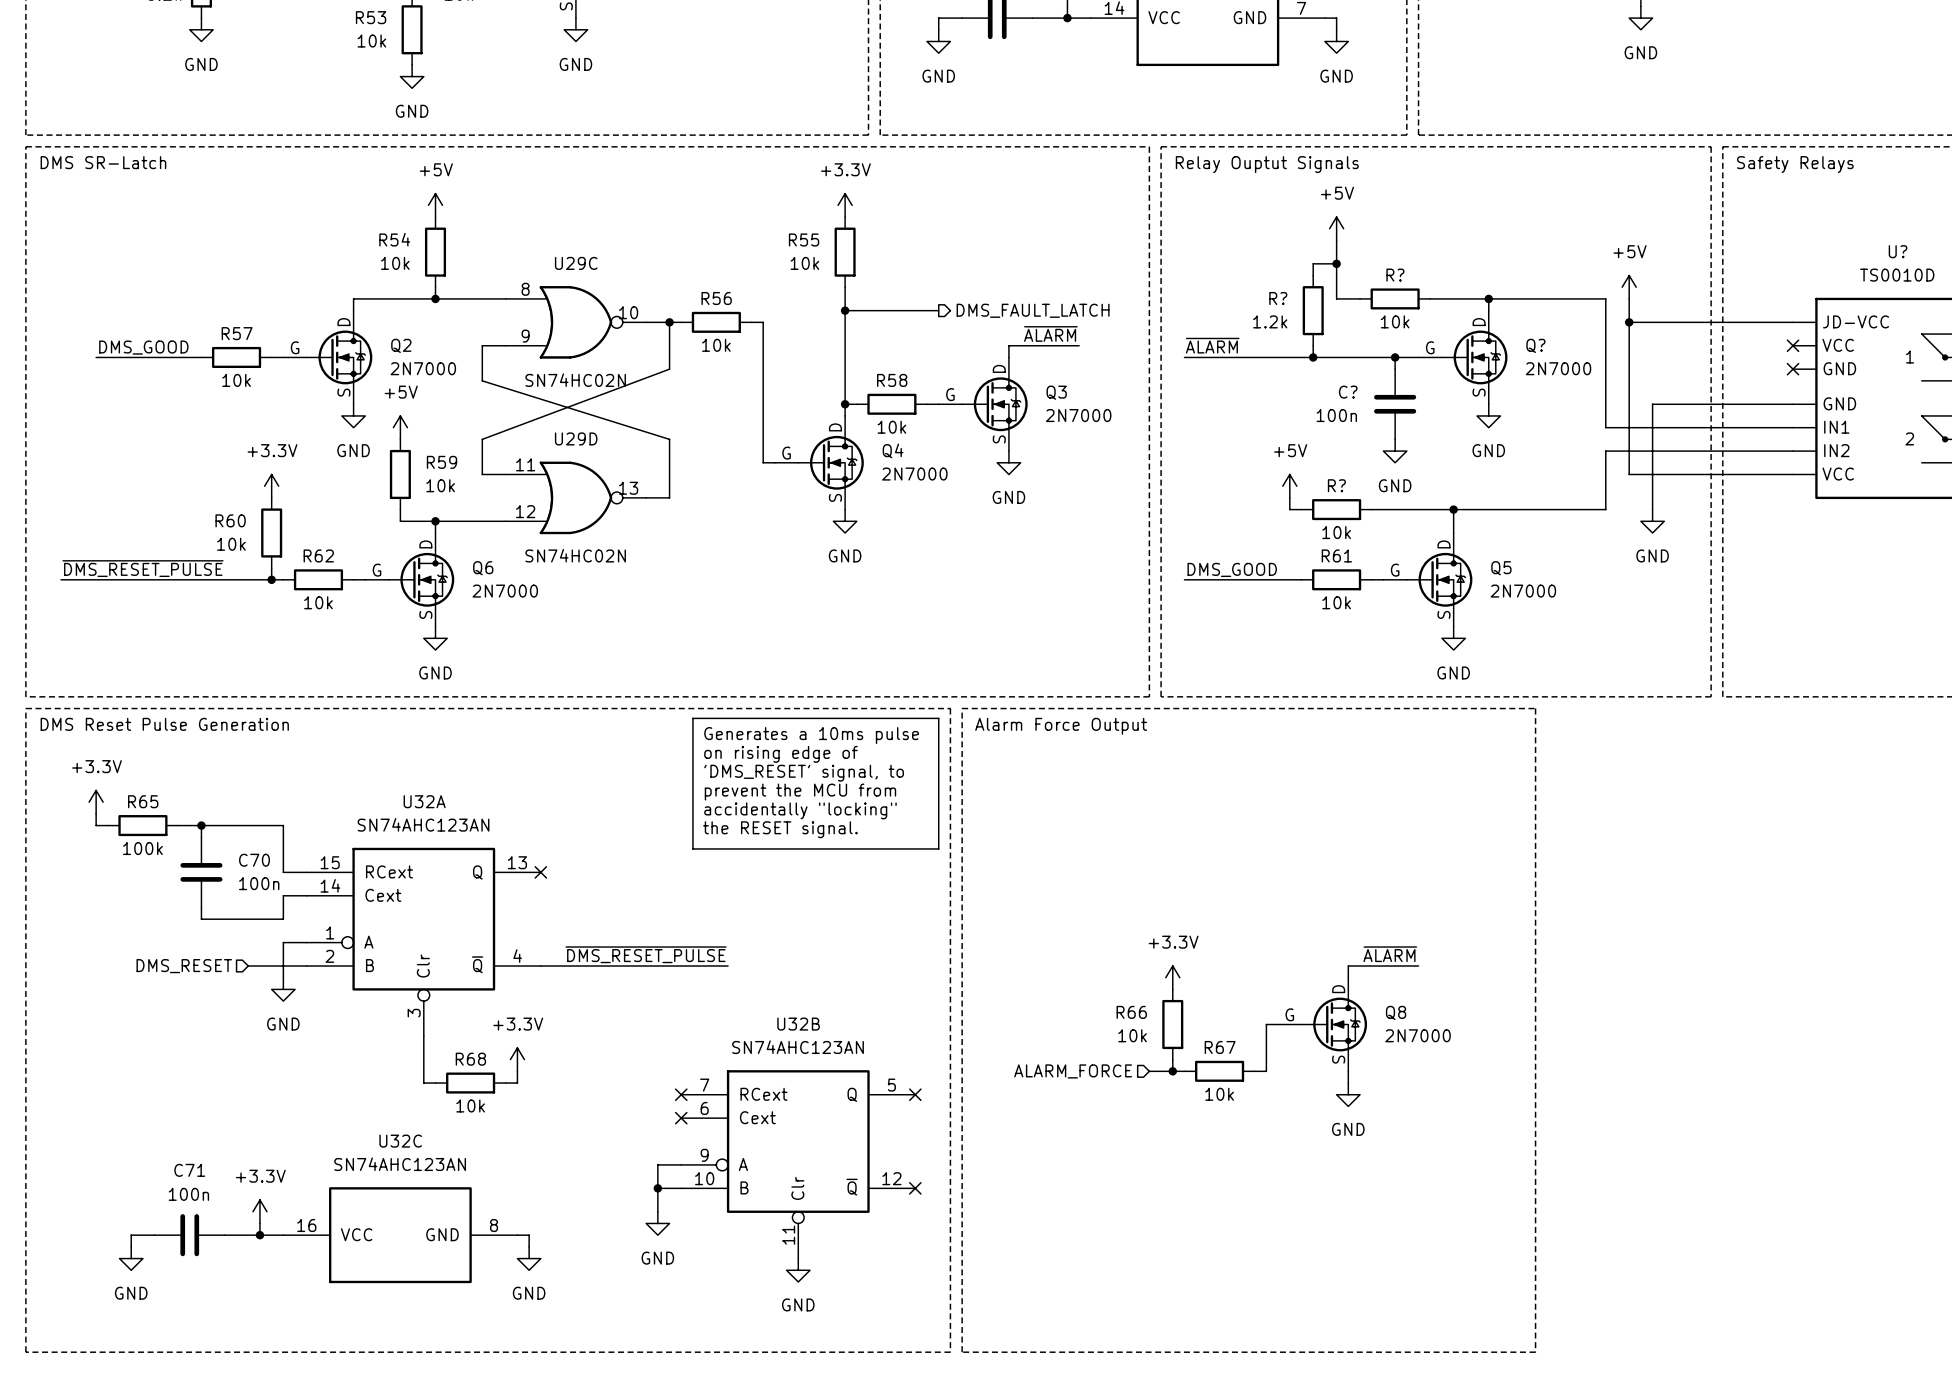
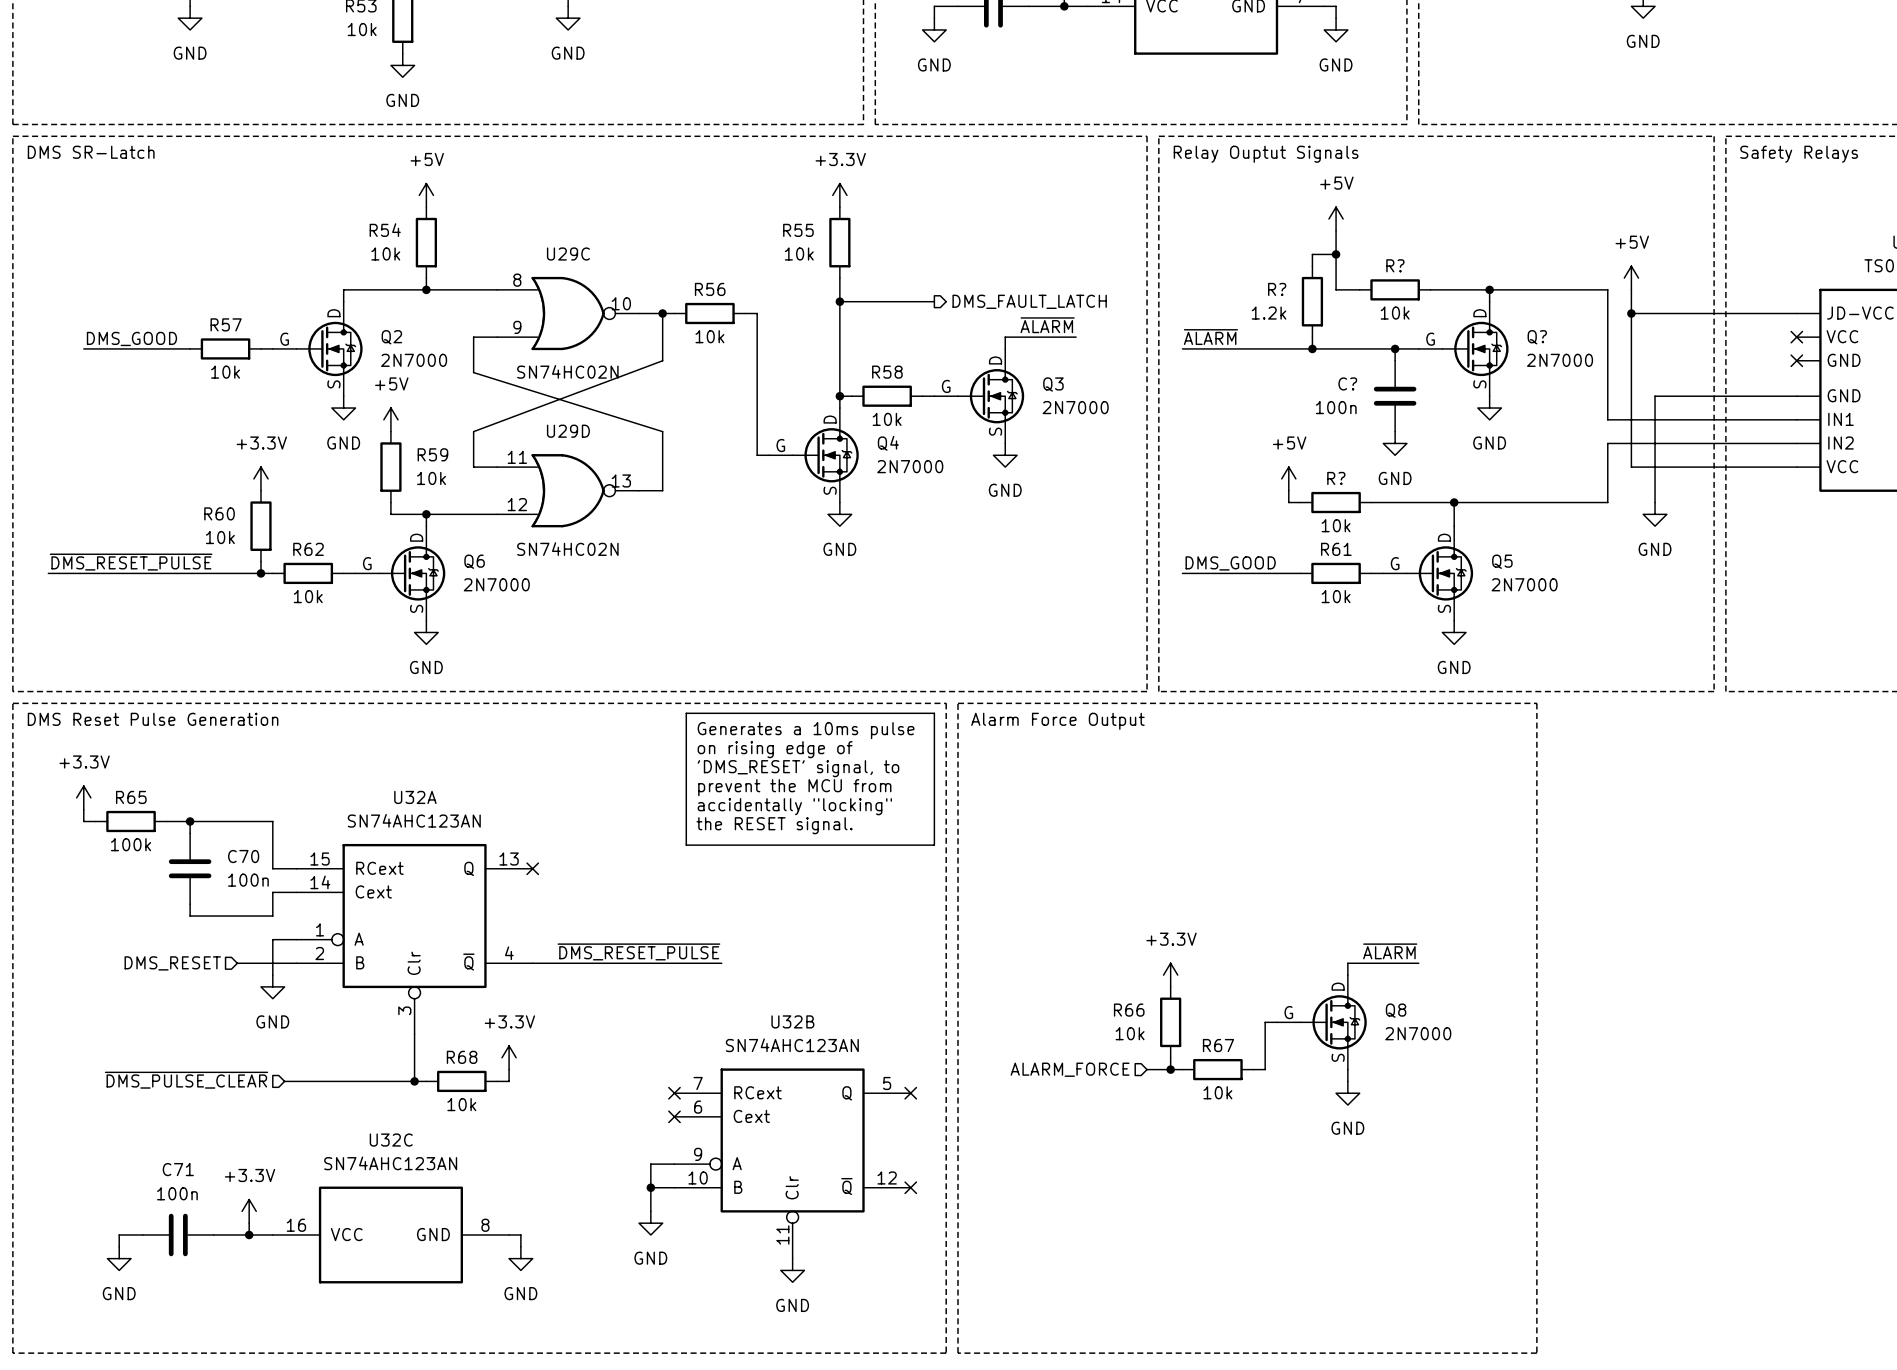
hierarchical label: none -> ~{DMS_PULSE_CLEAR} (186, 1080)
wire: none -> (284, 1081) (414, 1081)
junction: none -> (414, 1081)

